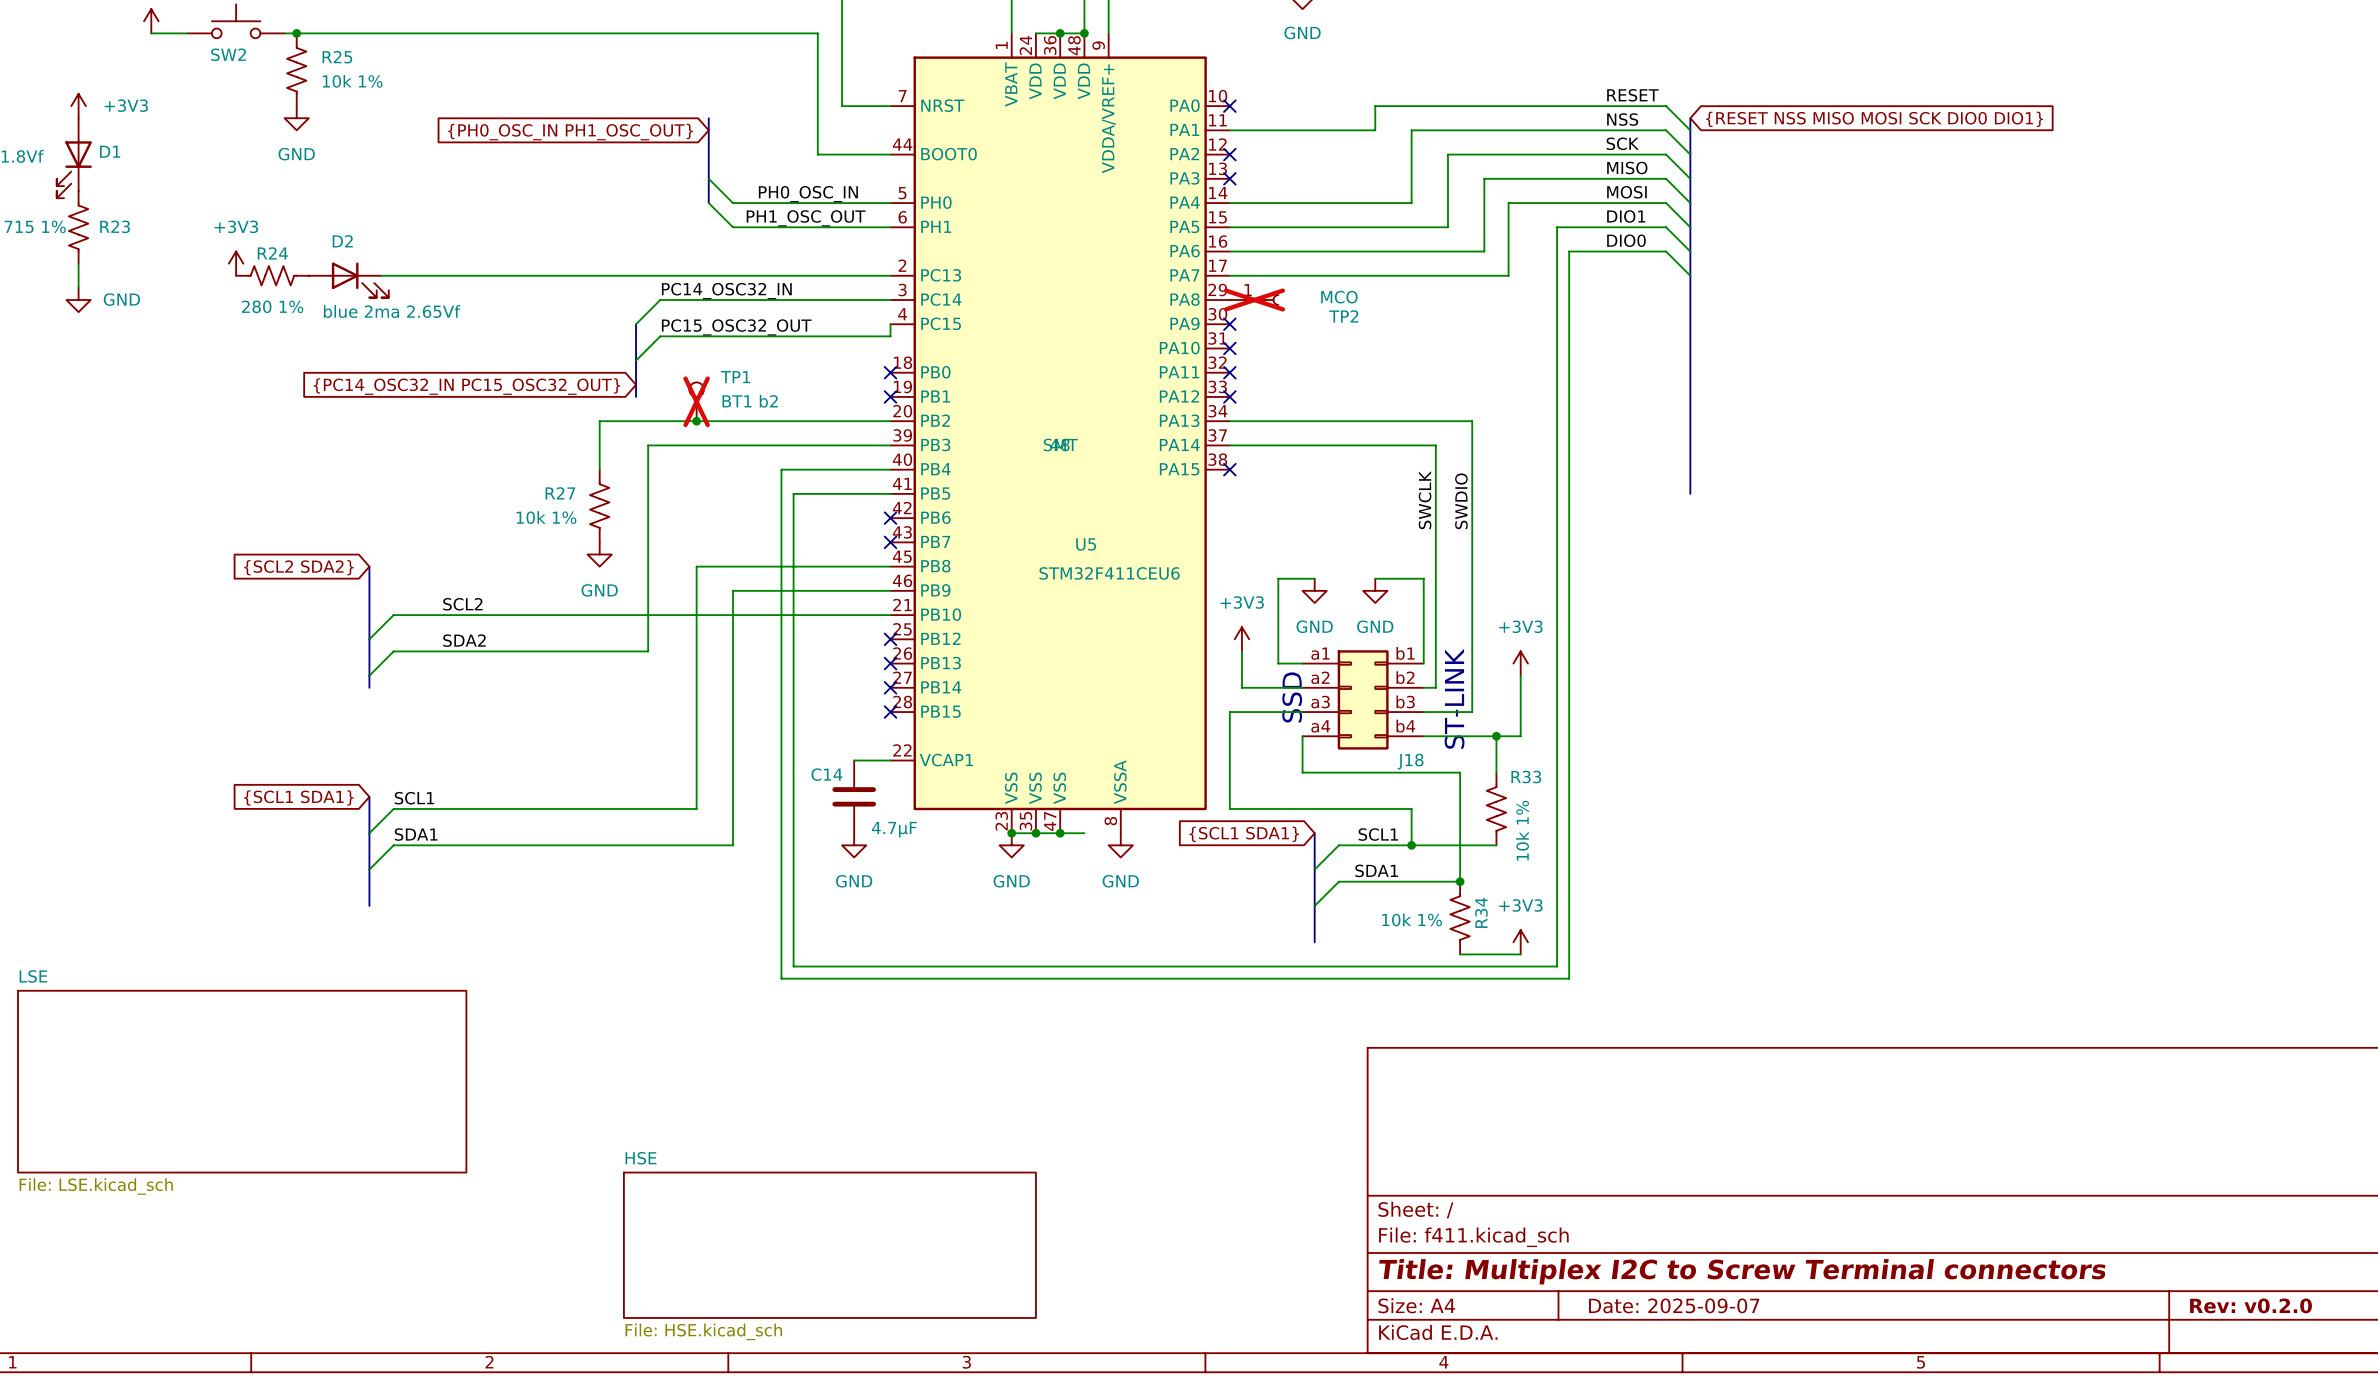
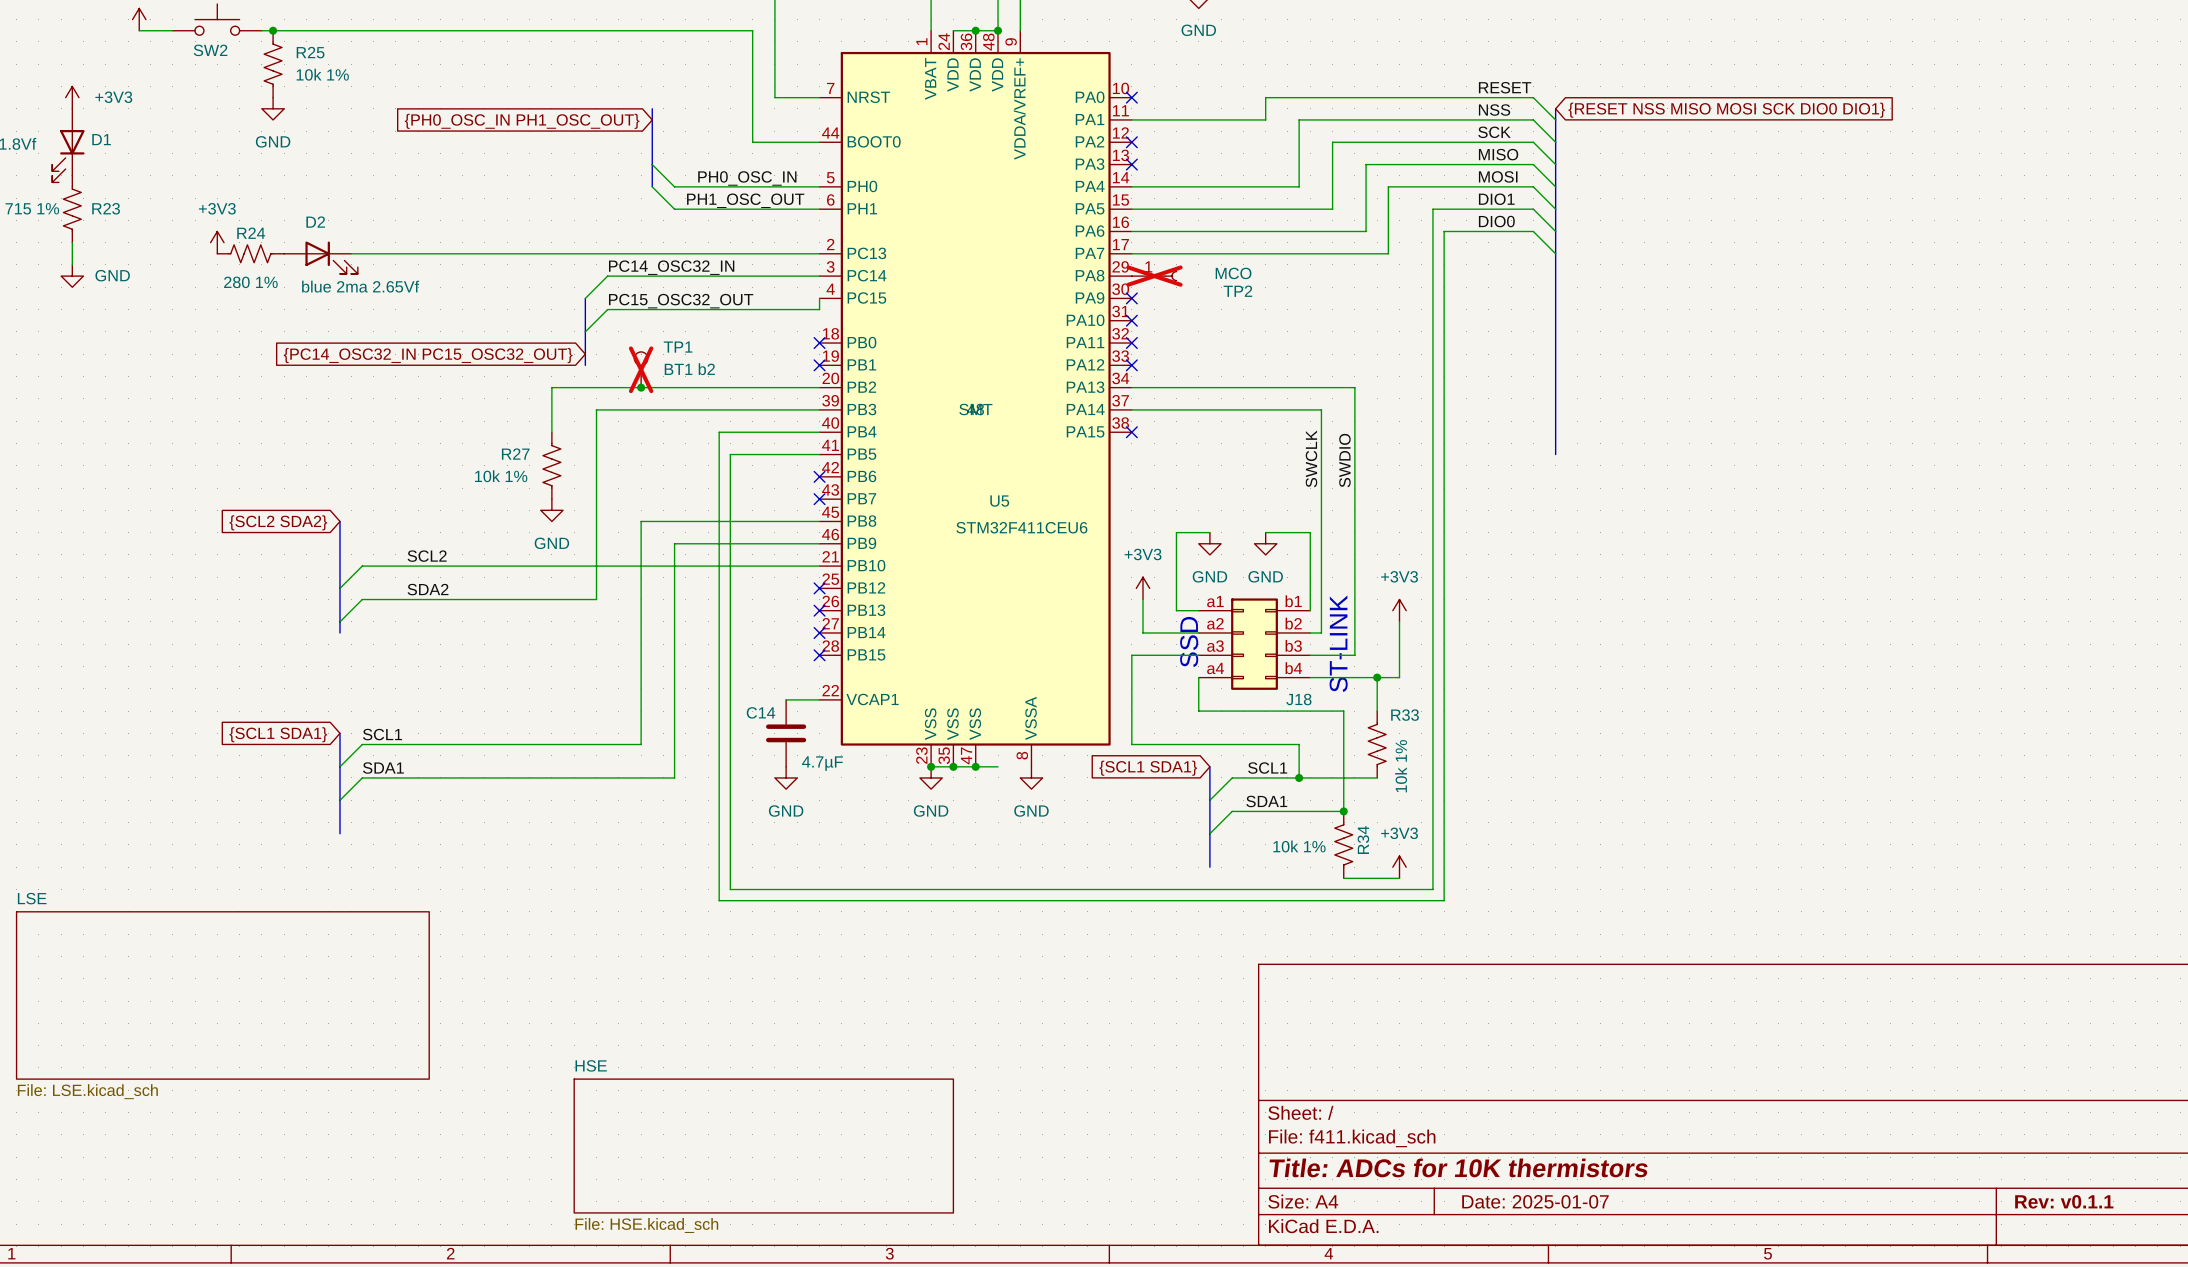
title block: Title: Multiplex I2C to Screw Terminal connectors (1742, 1271) -> Title: ADCs for 10K thermistors (1458, 1167)
title block: Date: 2025-09-07 (1674, 1305) -> Date: 2025-01-07 (1535, 1201)
title block: Rev: v0.2.0 (2251, 1305) -> Rev: v0.1.1 (2064, 1201)

